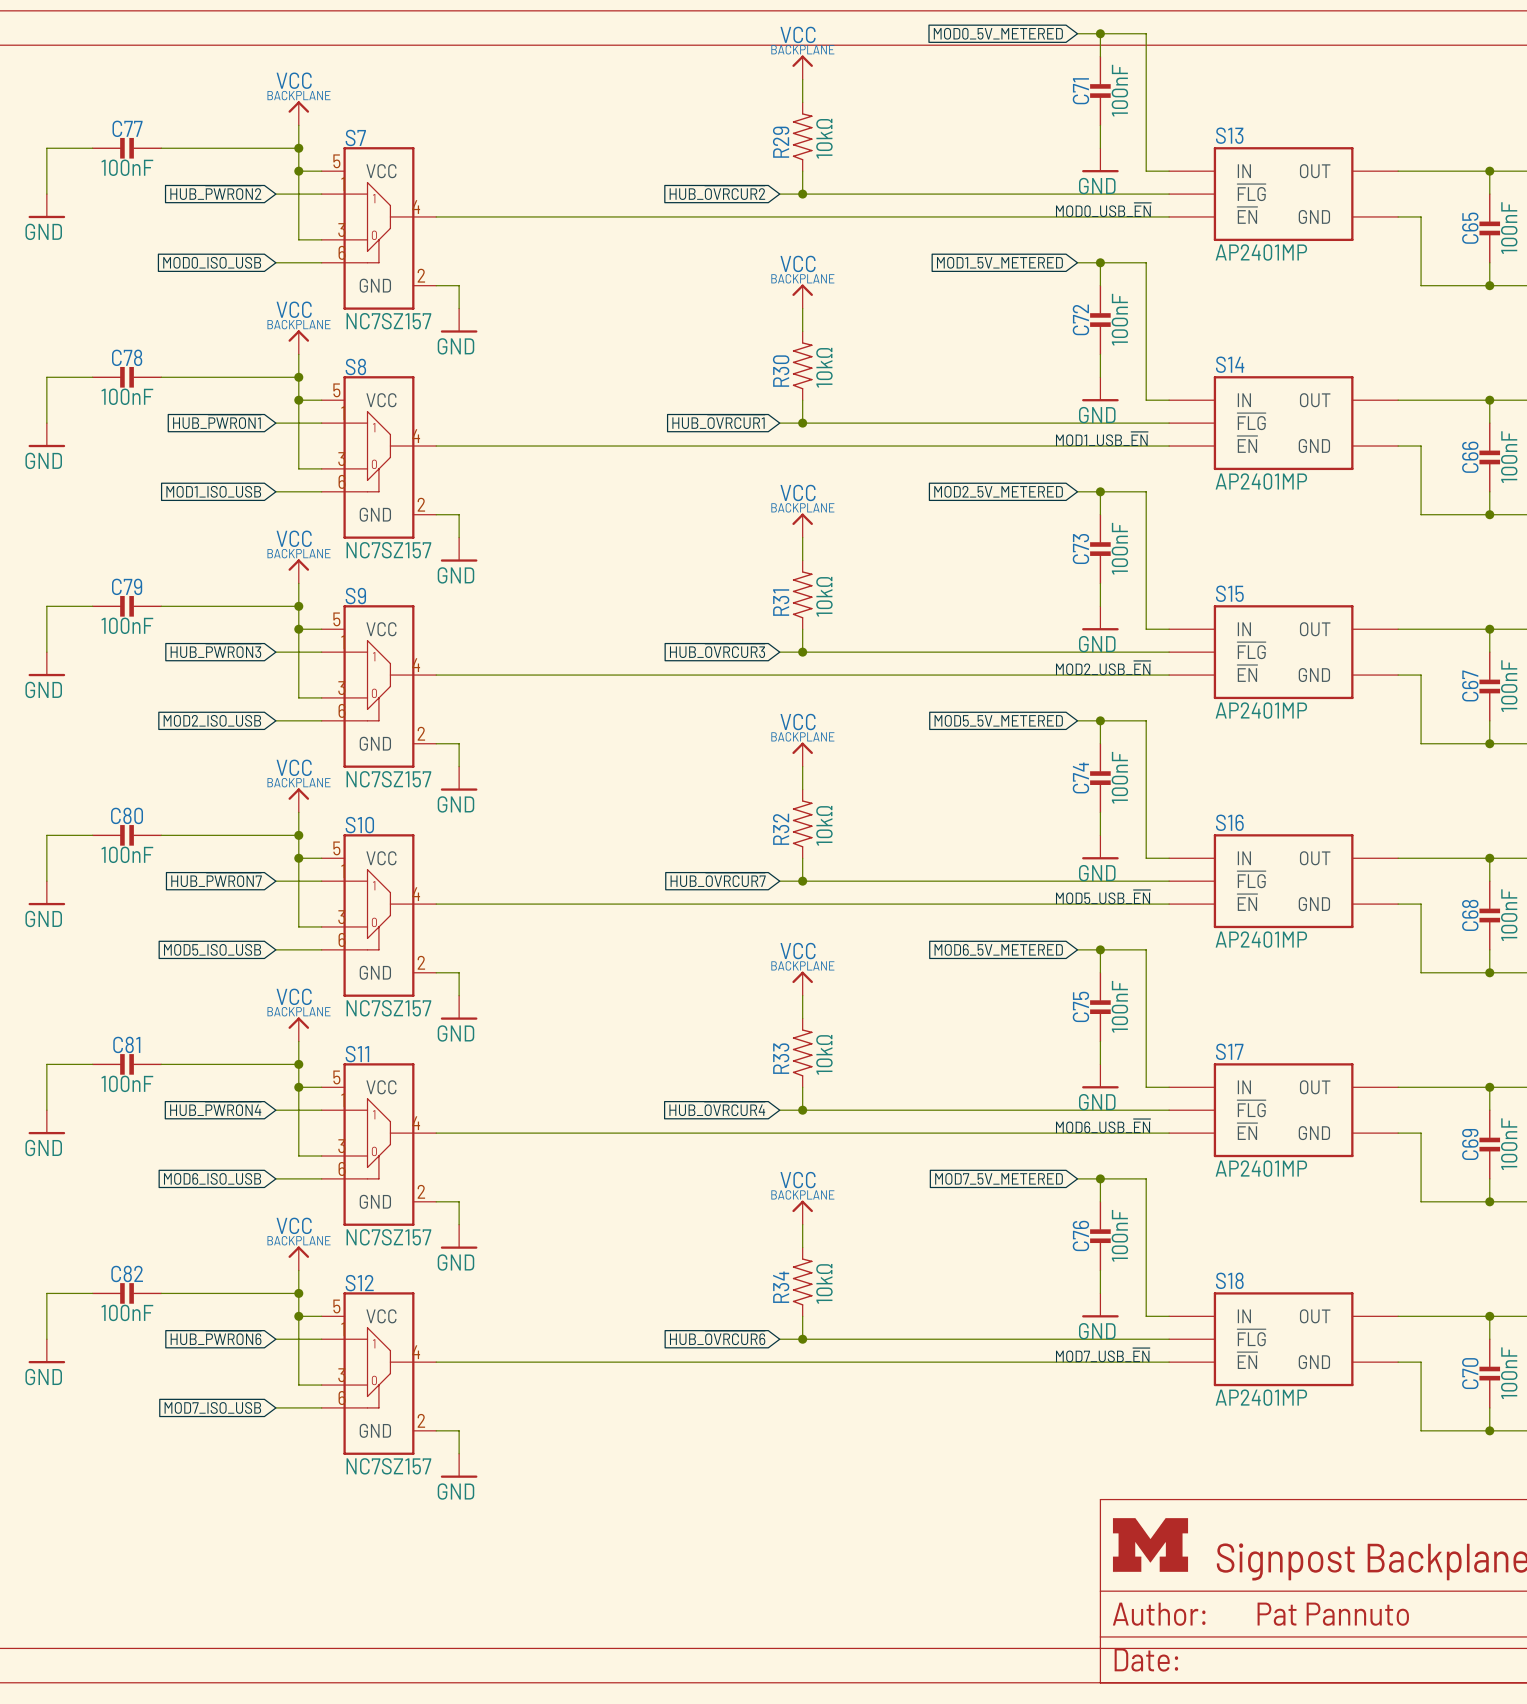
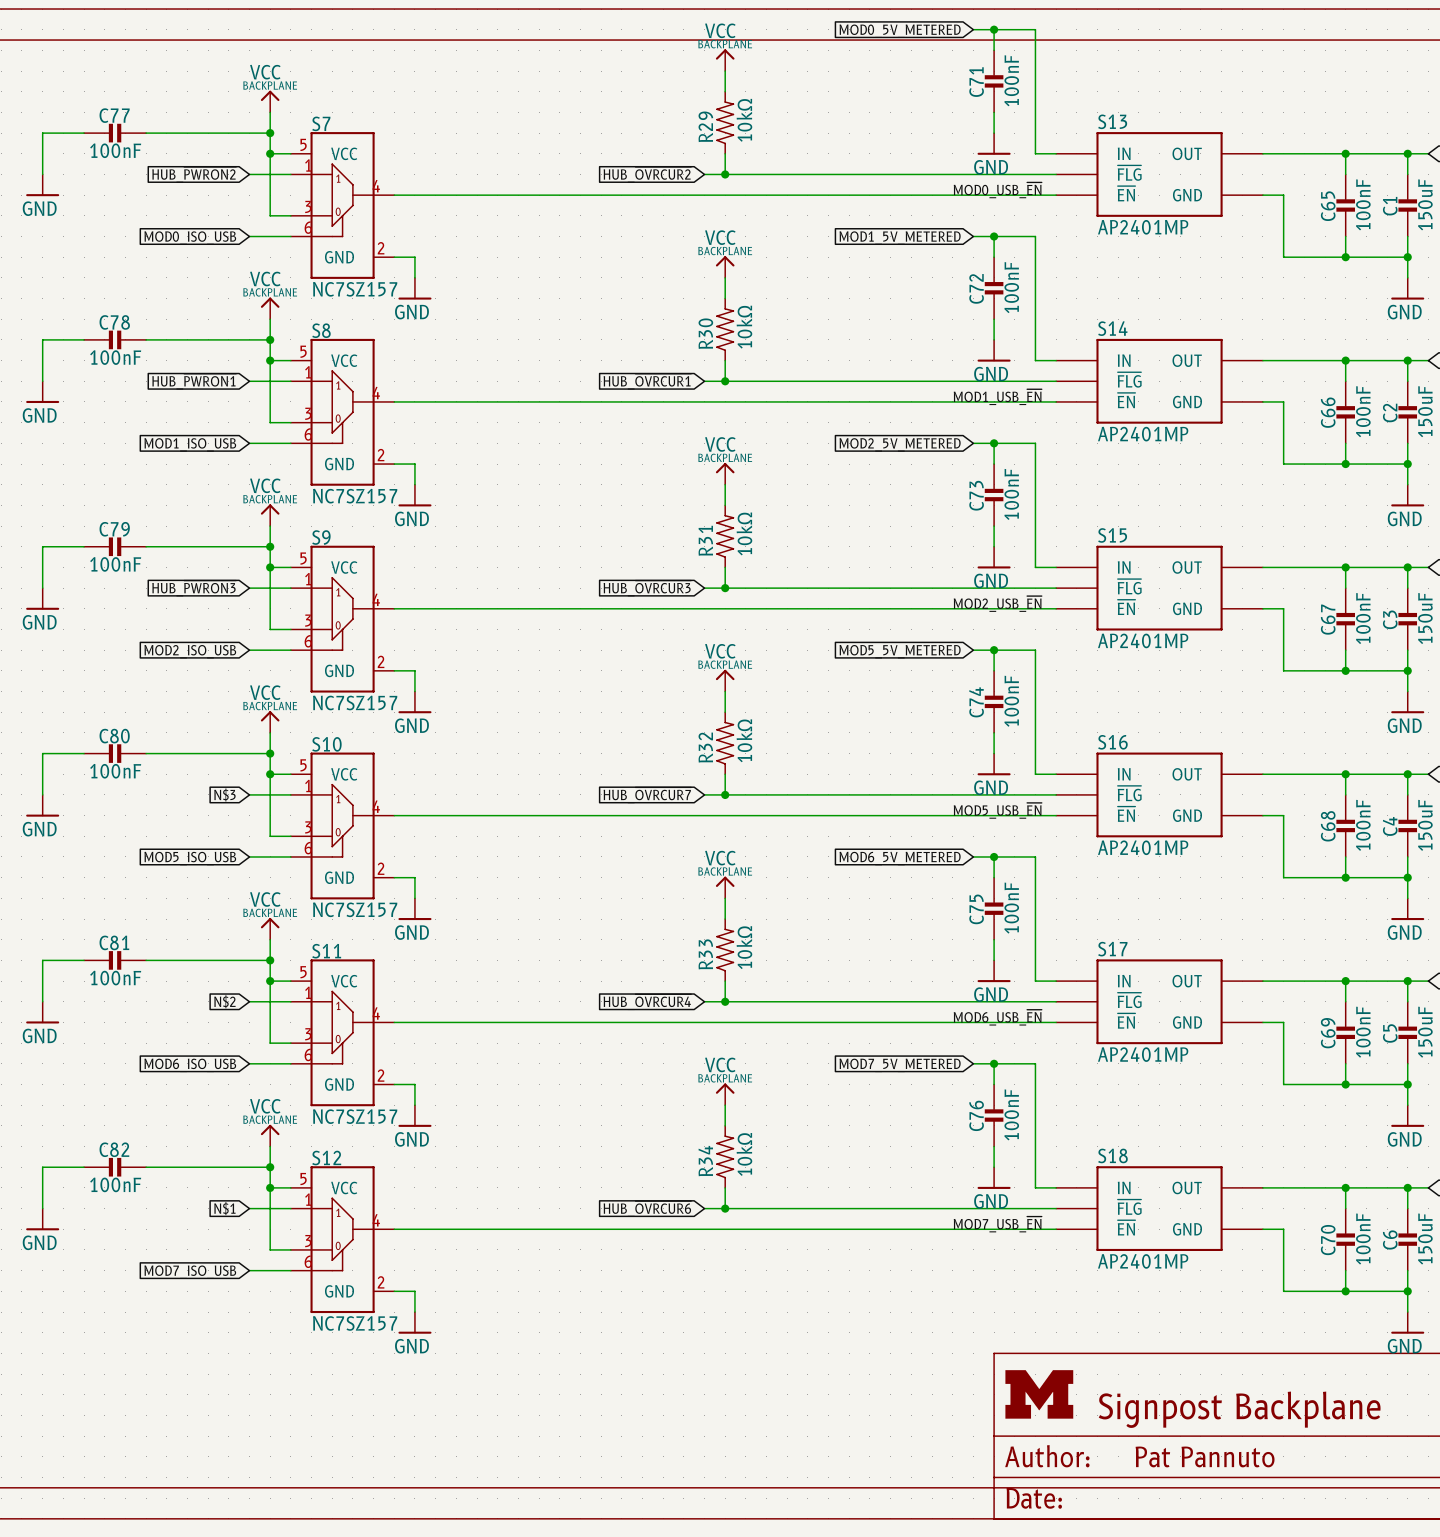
global label: HUB_~{PWRON7} (216, 879) -> N$3 (224, 794)
global label: HUB_~{PWRON4} (215, 1108) -> N$2 (224, 1001)
global label: HUB_~{PWRON6} (216, 1337) -> N$1 (224, 1208)

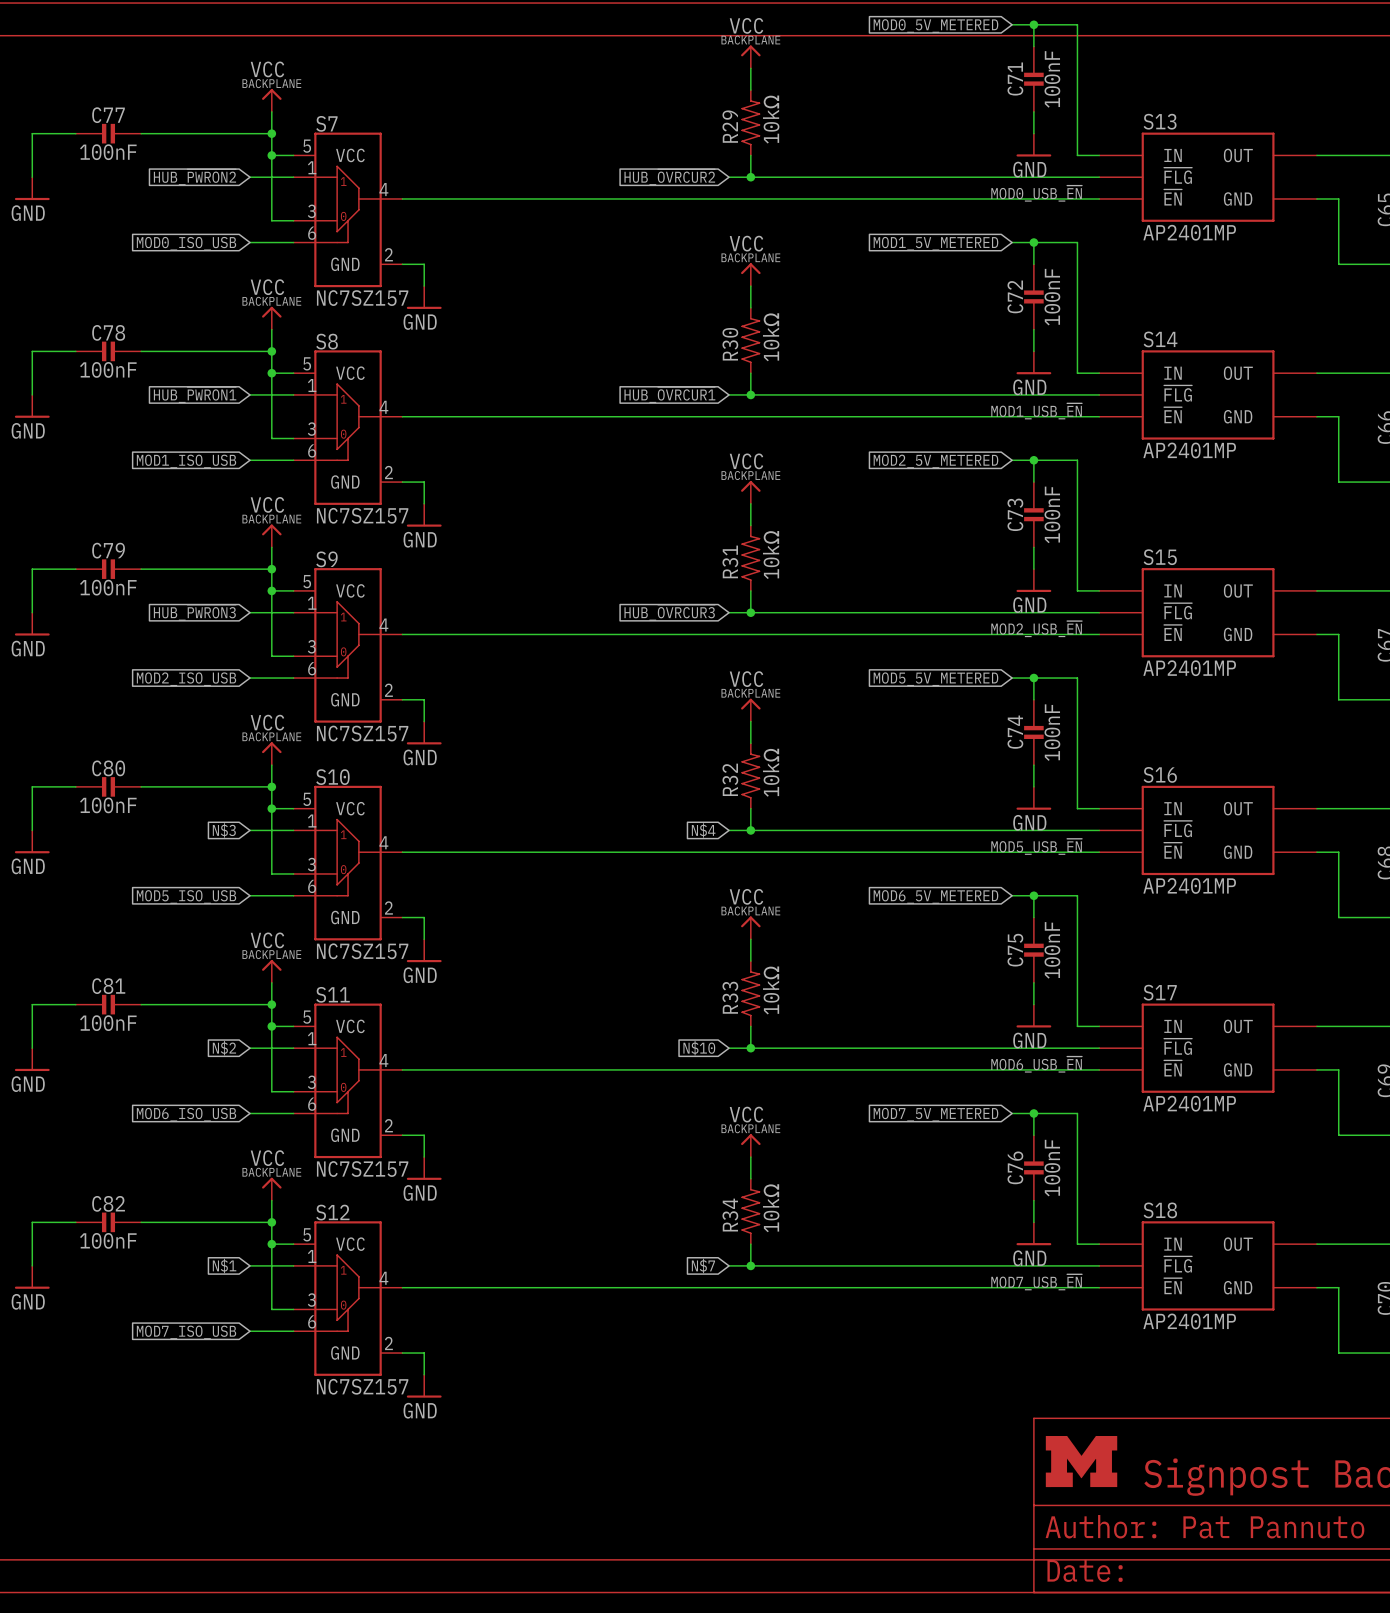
global label: HUB_~{OVRCUR7} (647, 795) -> N$4 (703, 830)
global label: HUB_~{OVRCUR4} (647, 1002) -> N$10 (699, 1048)
global label: HUB_~{OVRCUR6} (647, 1208) -> N$7 (703, 1265)

